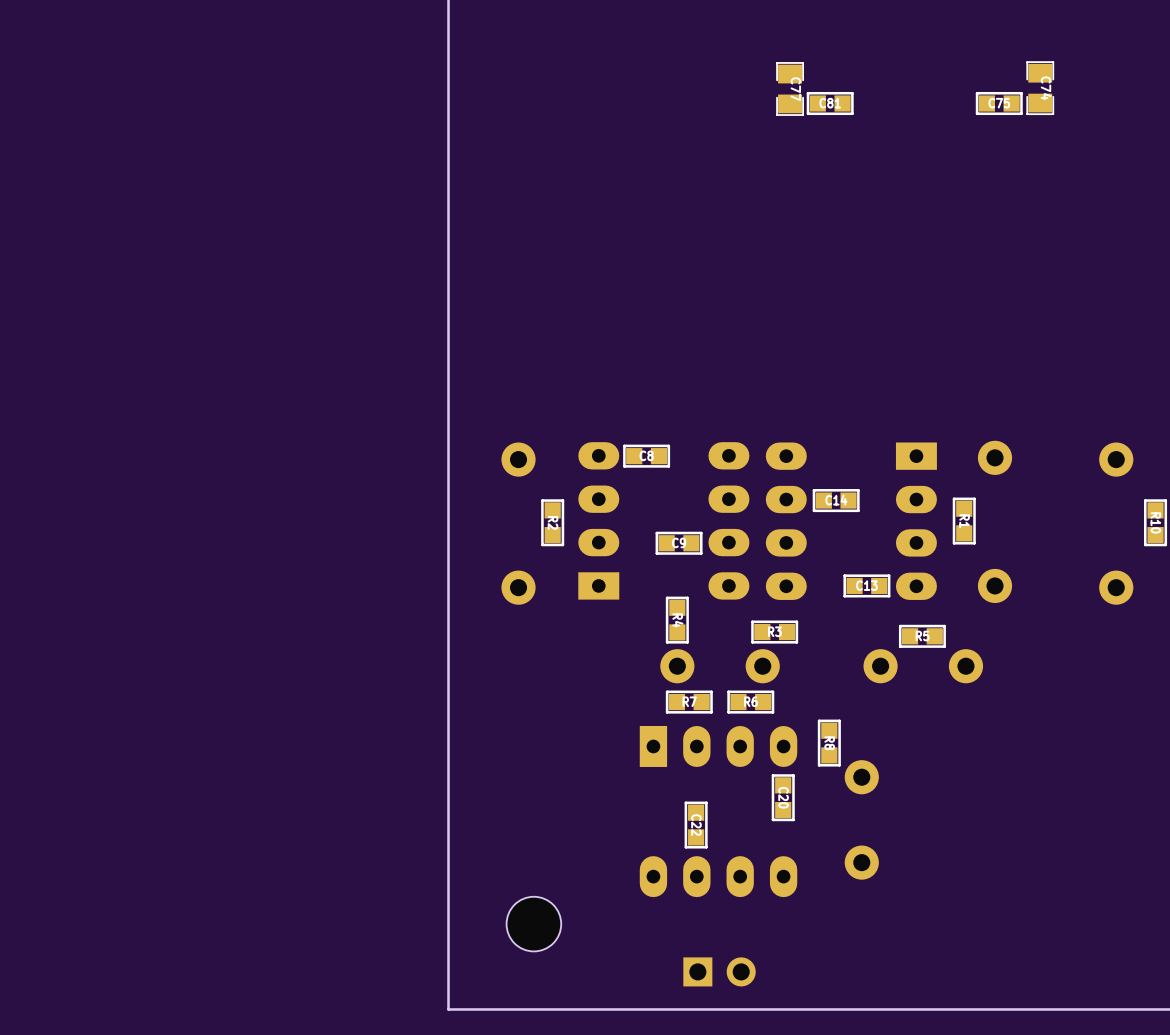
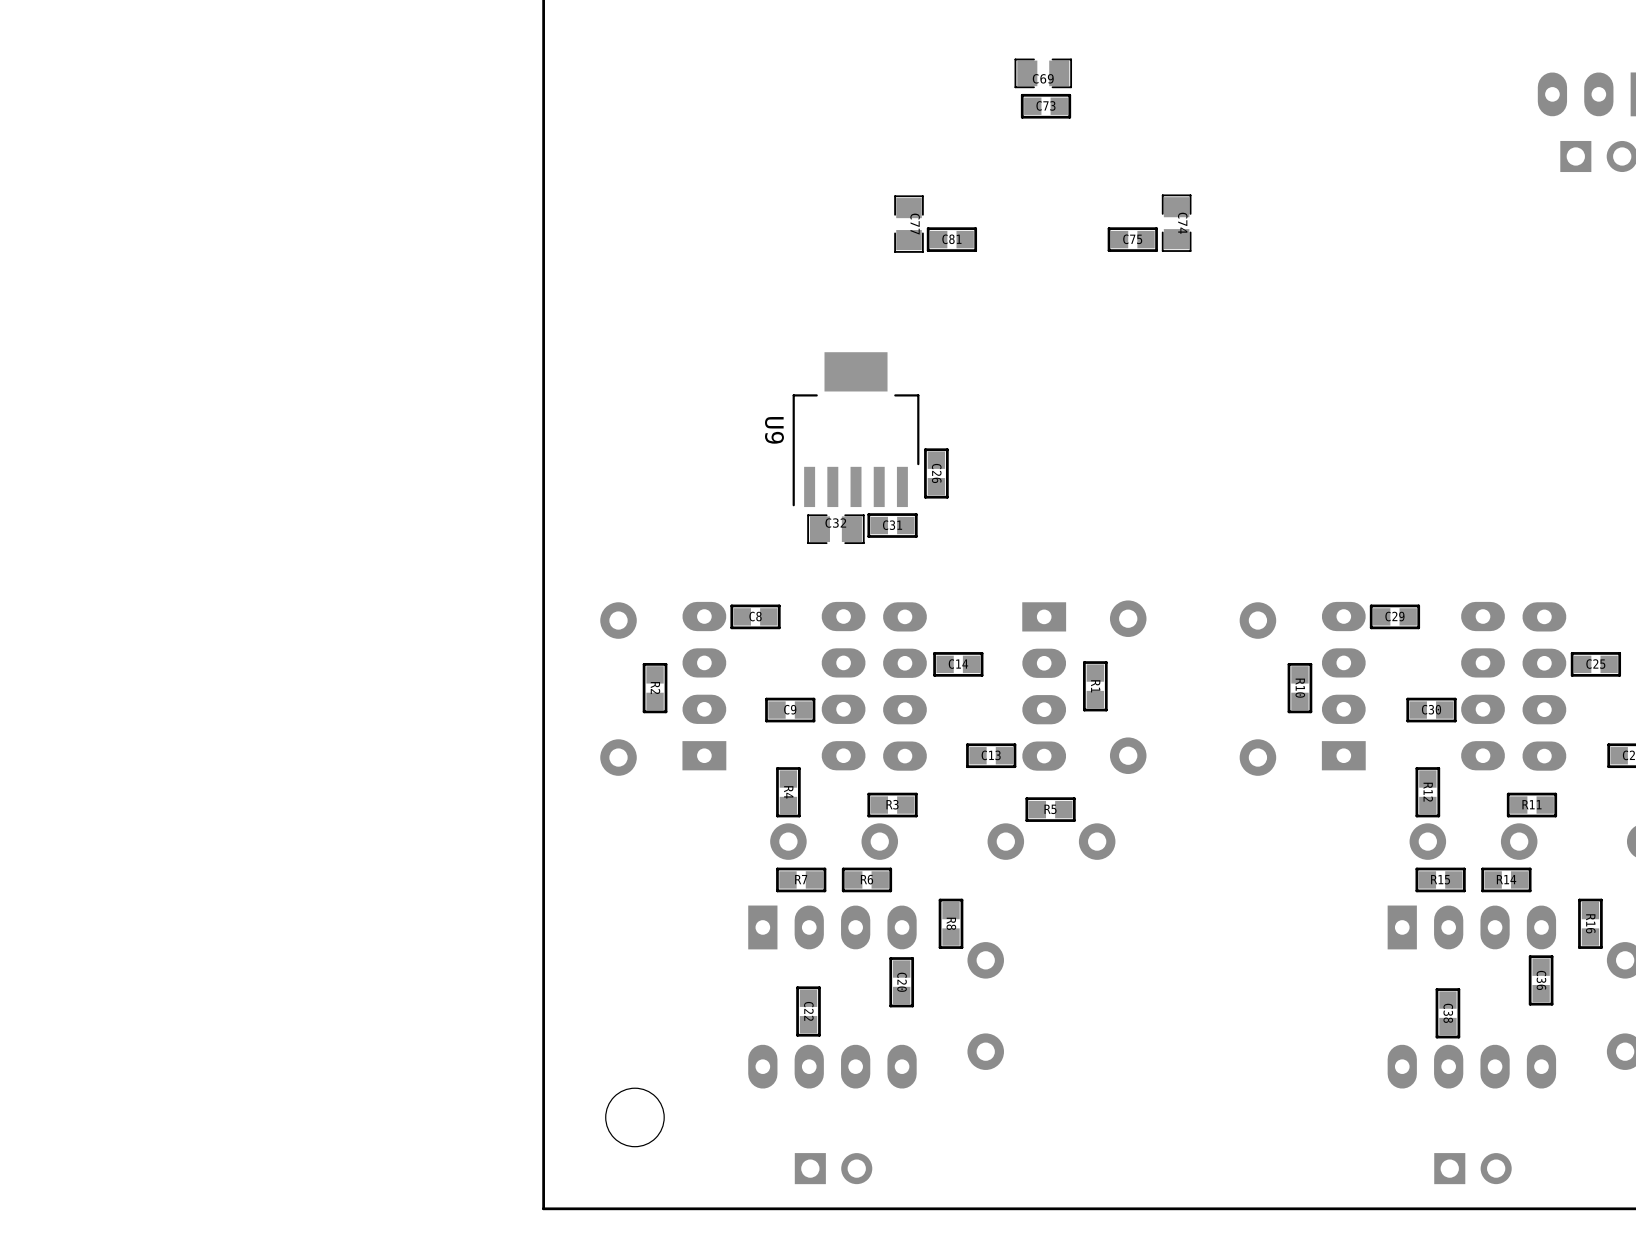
U9: none -> (856, 429)
C26: none -> (936, 473)
C31: none -> (892, 525)
C32: none -> (835, 529)

